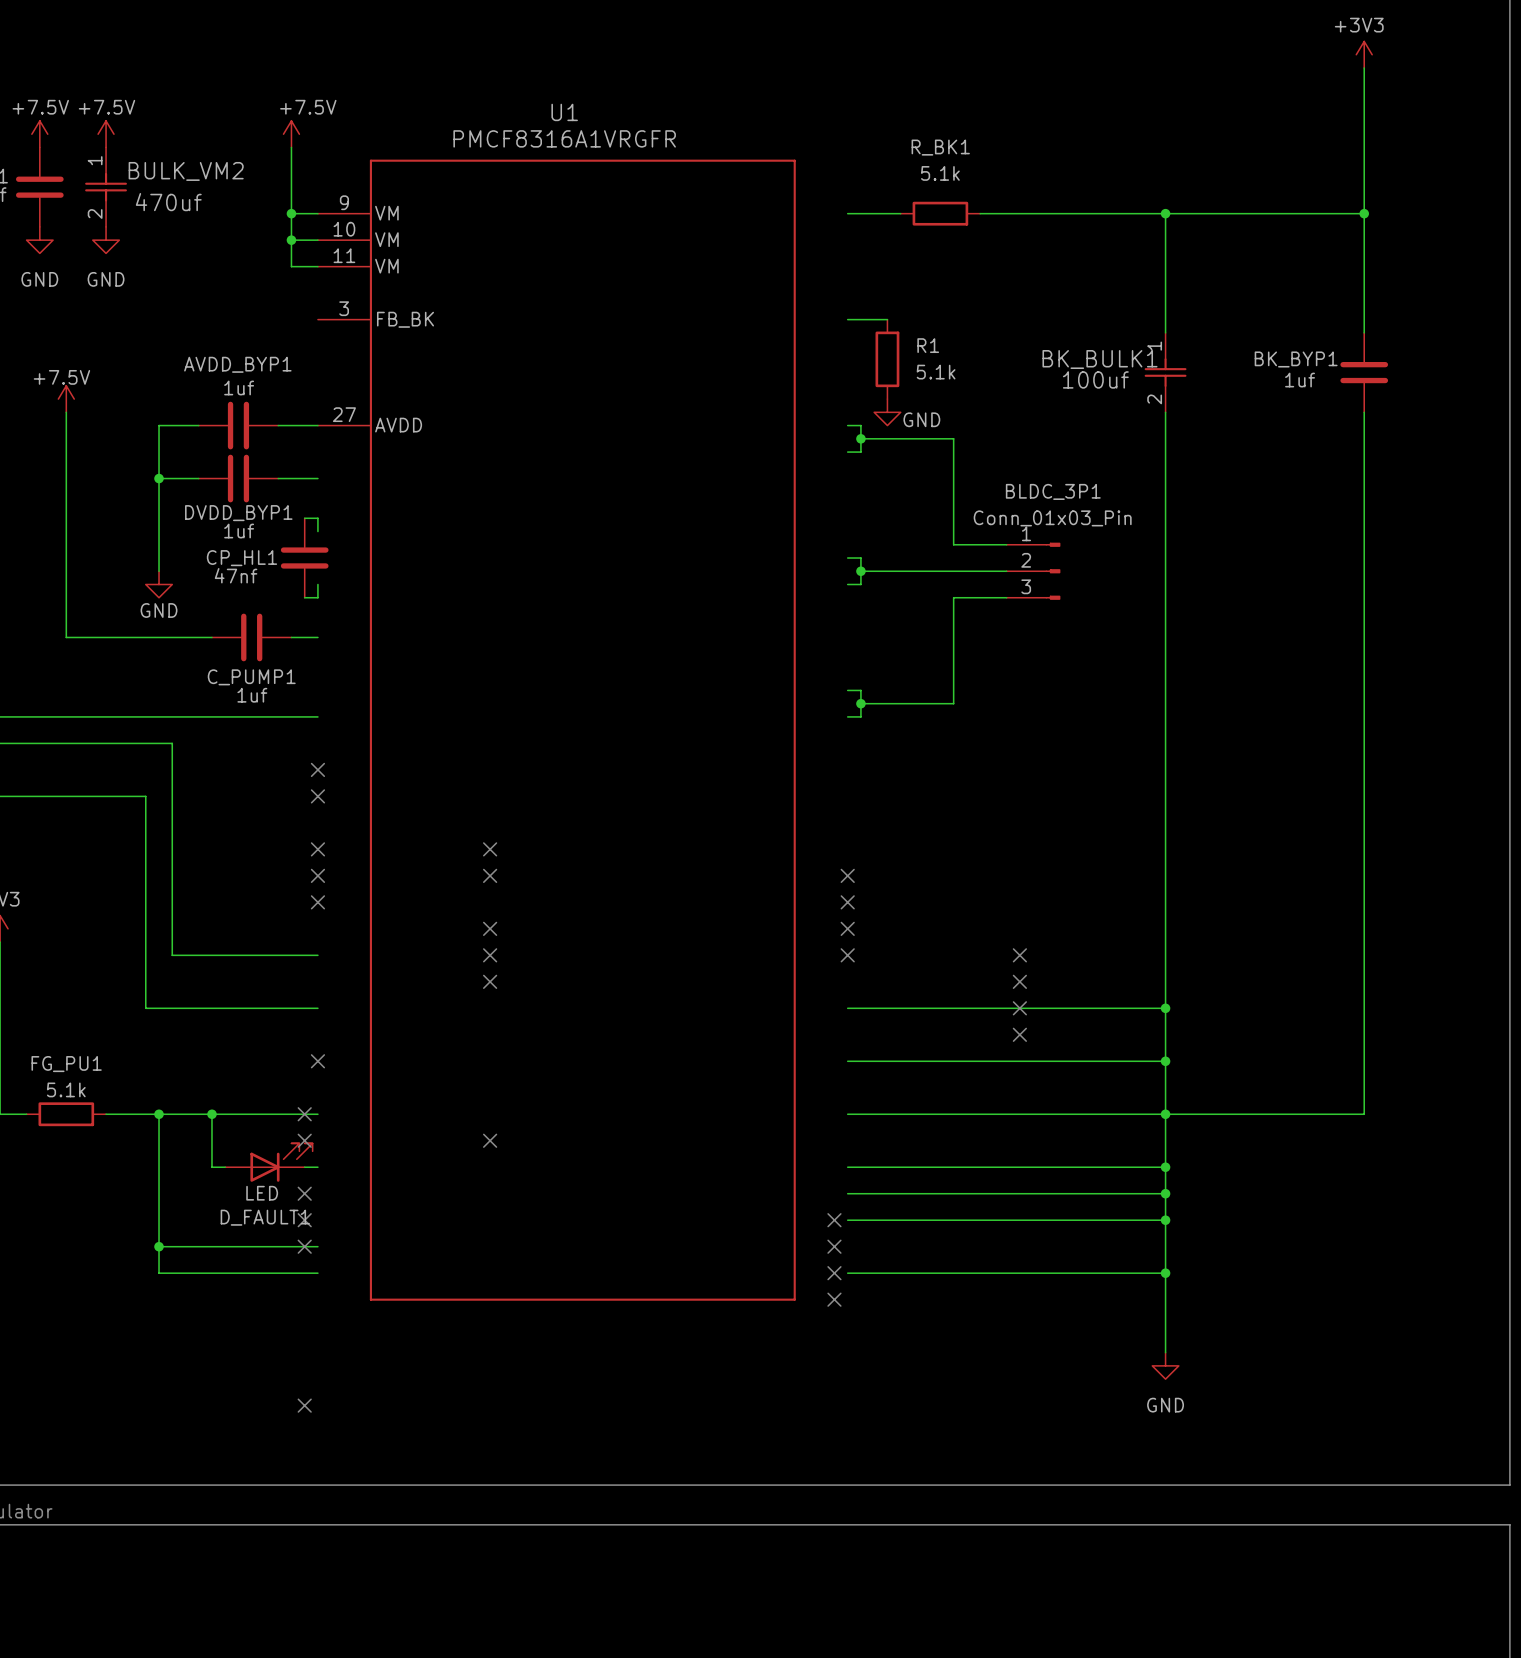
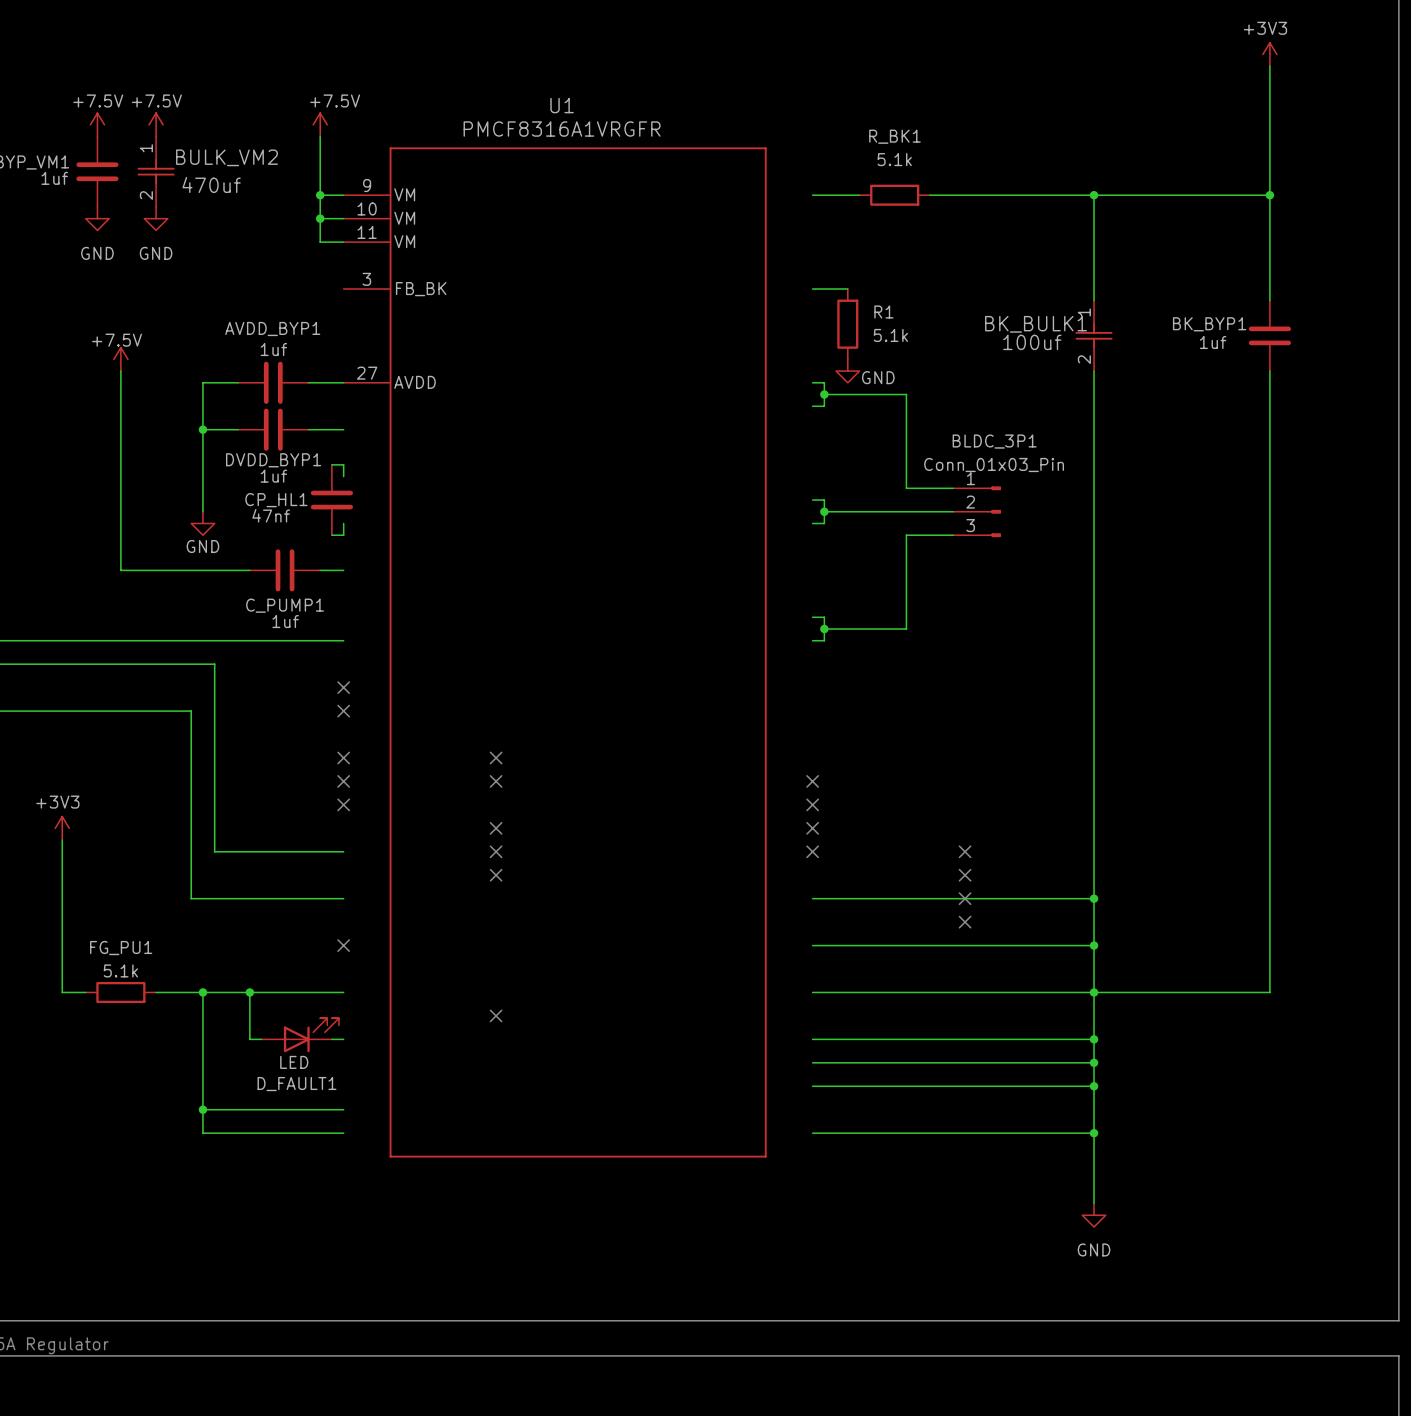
no-connect mark: (304, 1114) -> none
no-connect mark: (304, 1140) -> none
no-connect mark: (304, 1193) -> none
no-connect mark: (304, 1220) -> none
no-connect mark: (834, 1220) -> none
no-connect mark: (304, 1246) -> none
no-connect mark: (834, 1246) -> none
no-connect mark: (834, 1273) -> none
no-connect mark: (834, 1299) -> none
no-connect mark: (304, 1405) -> none

